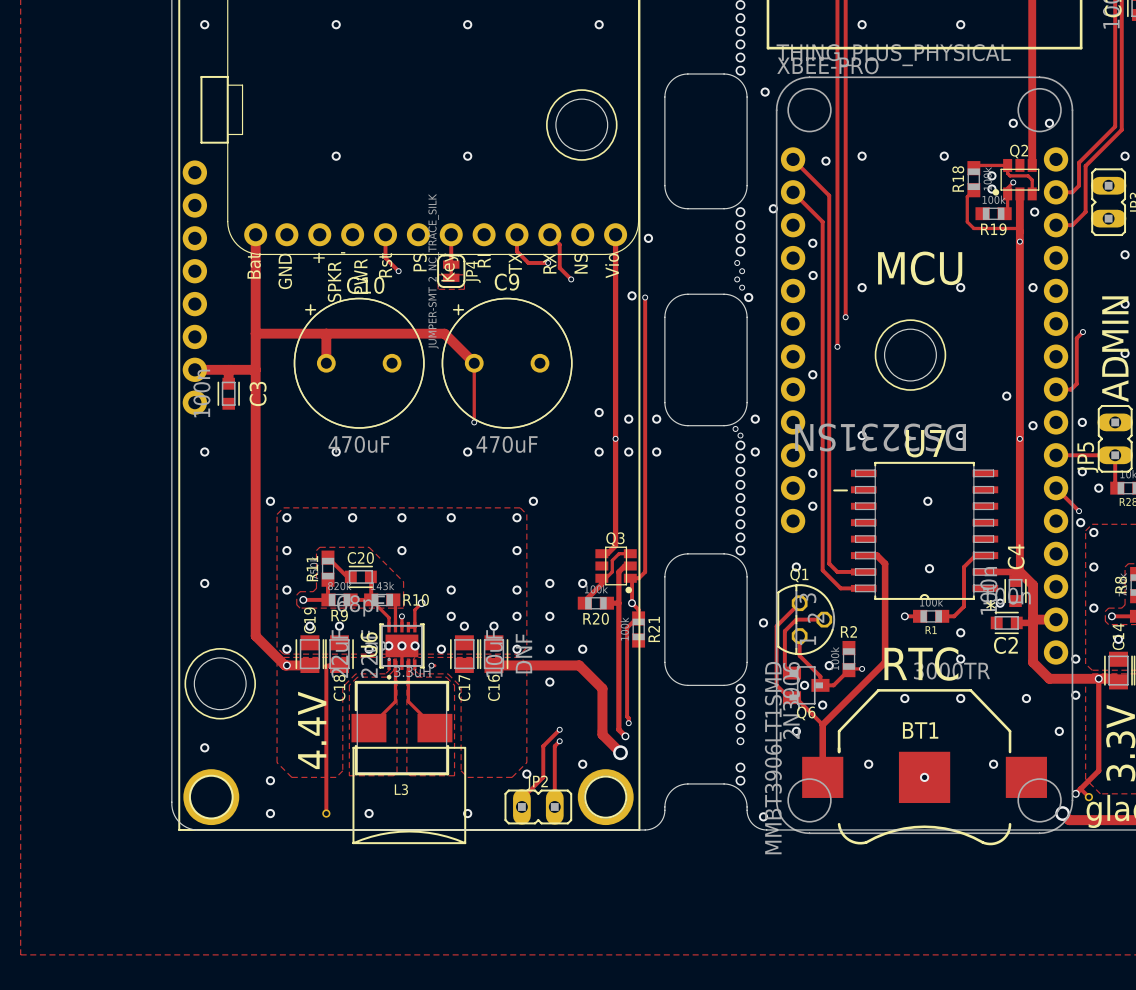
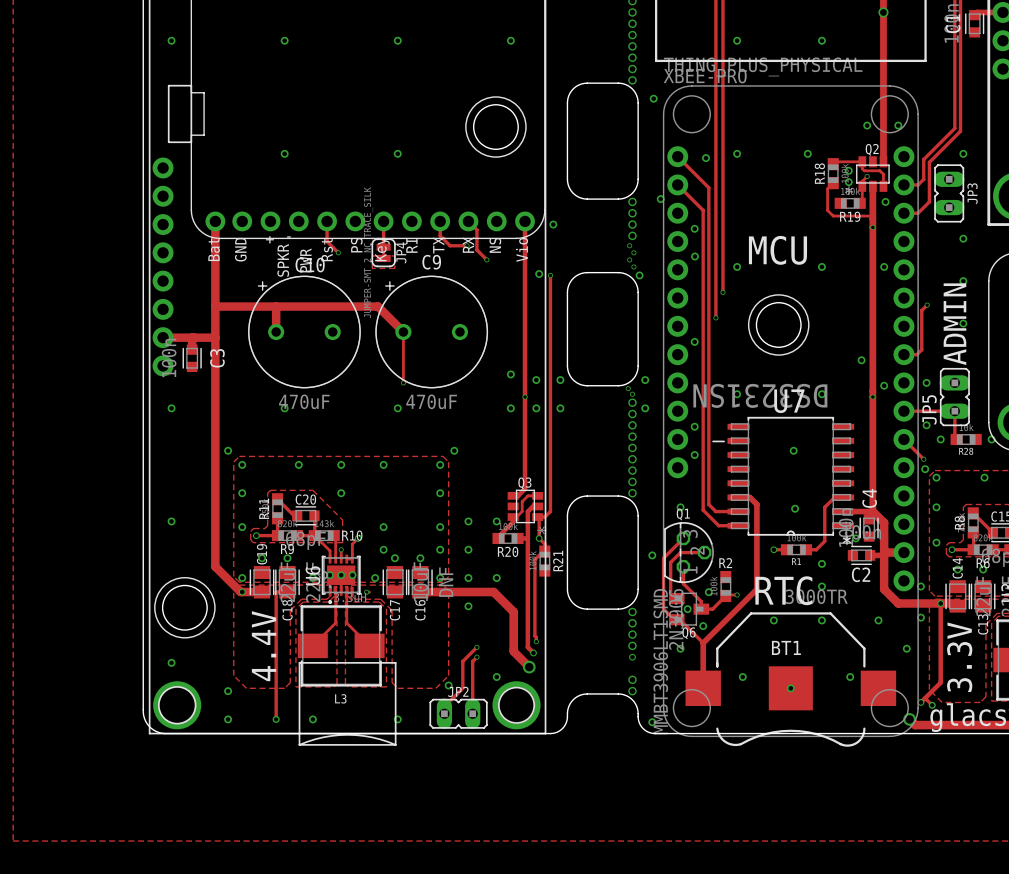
Q2 footprint: [992, 158, 1040, 201] -> [856, 156, 890, 192]
Q3 footprint: [595, 546, 637, 594] -> [507, 489, 544, 524]

